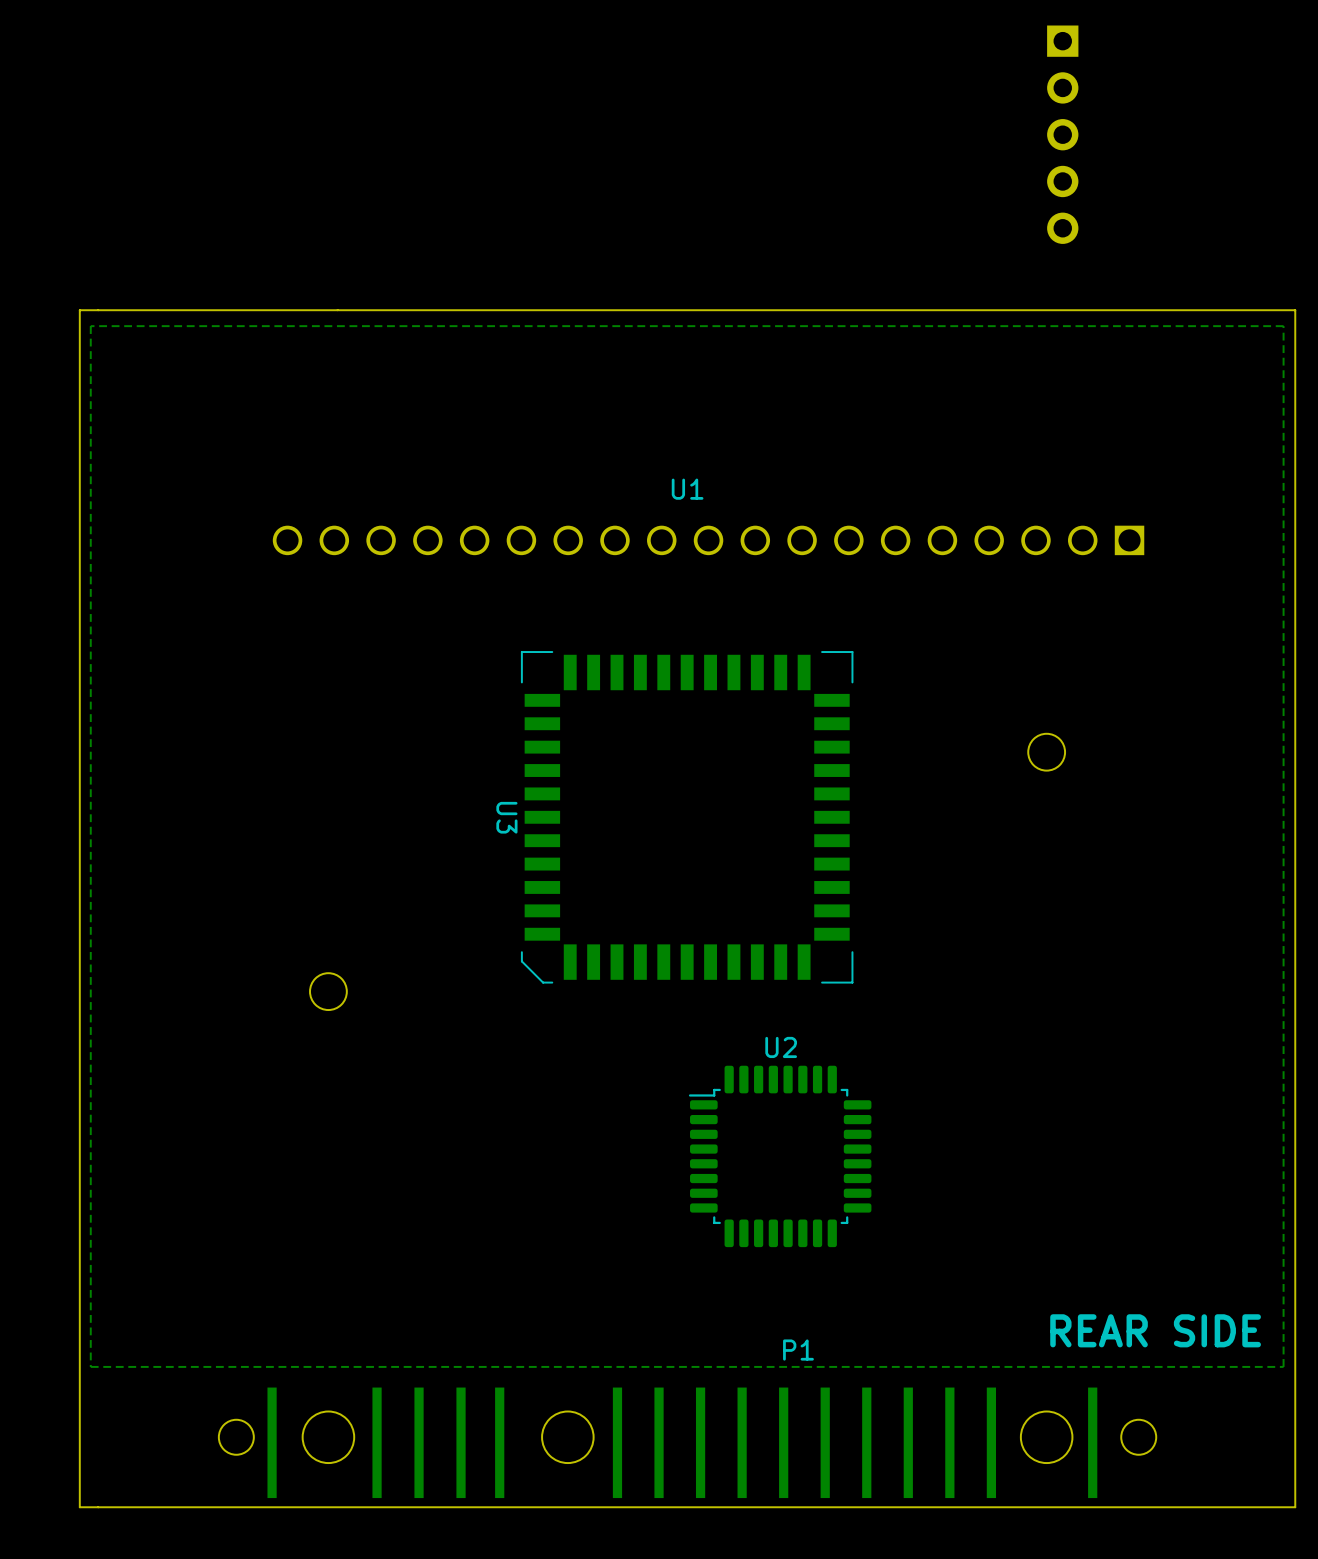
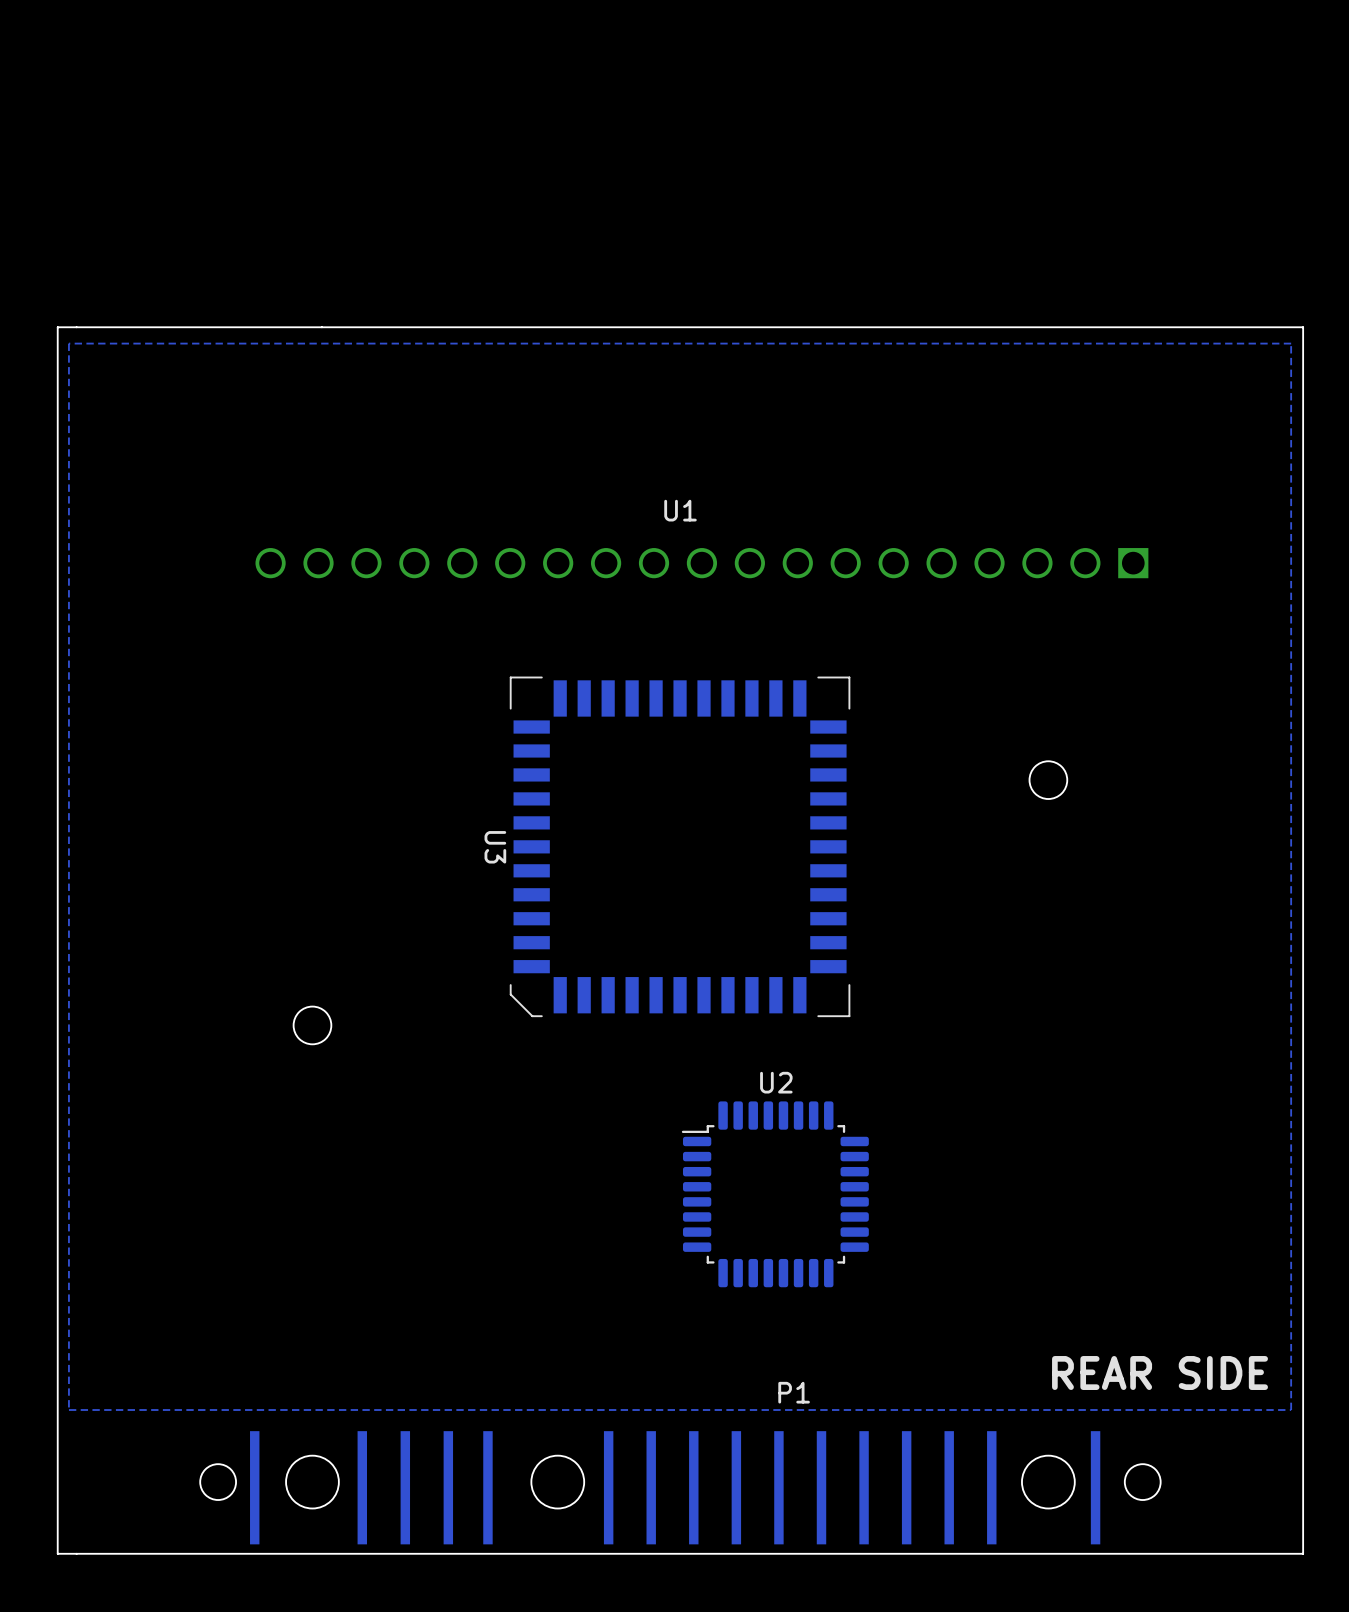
part: (1062, 134) -> none

